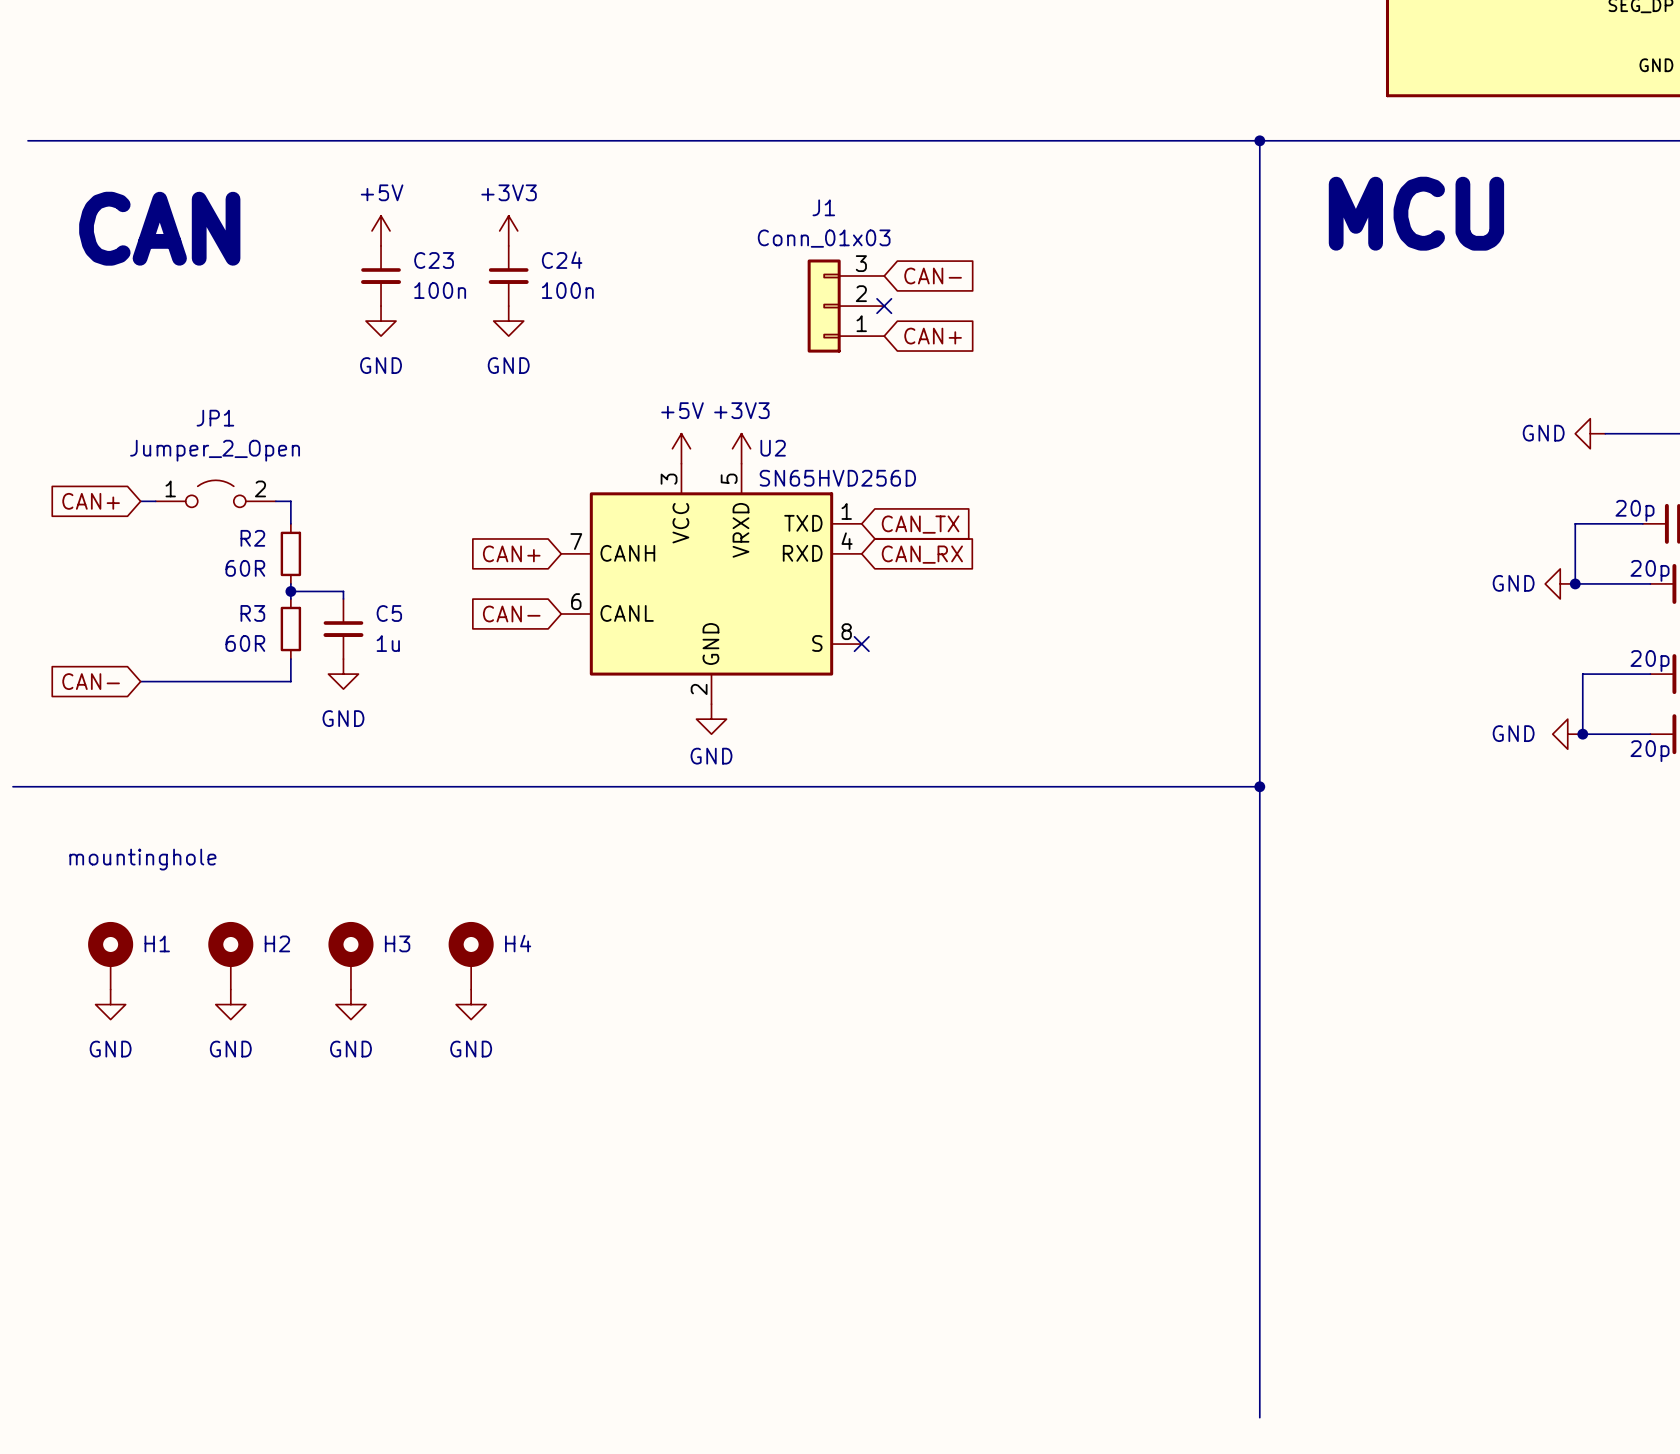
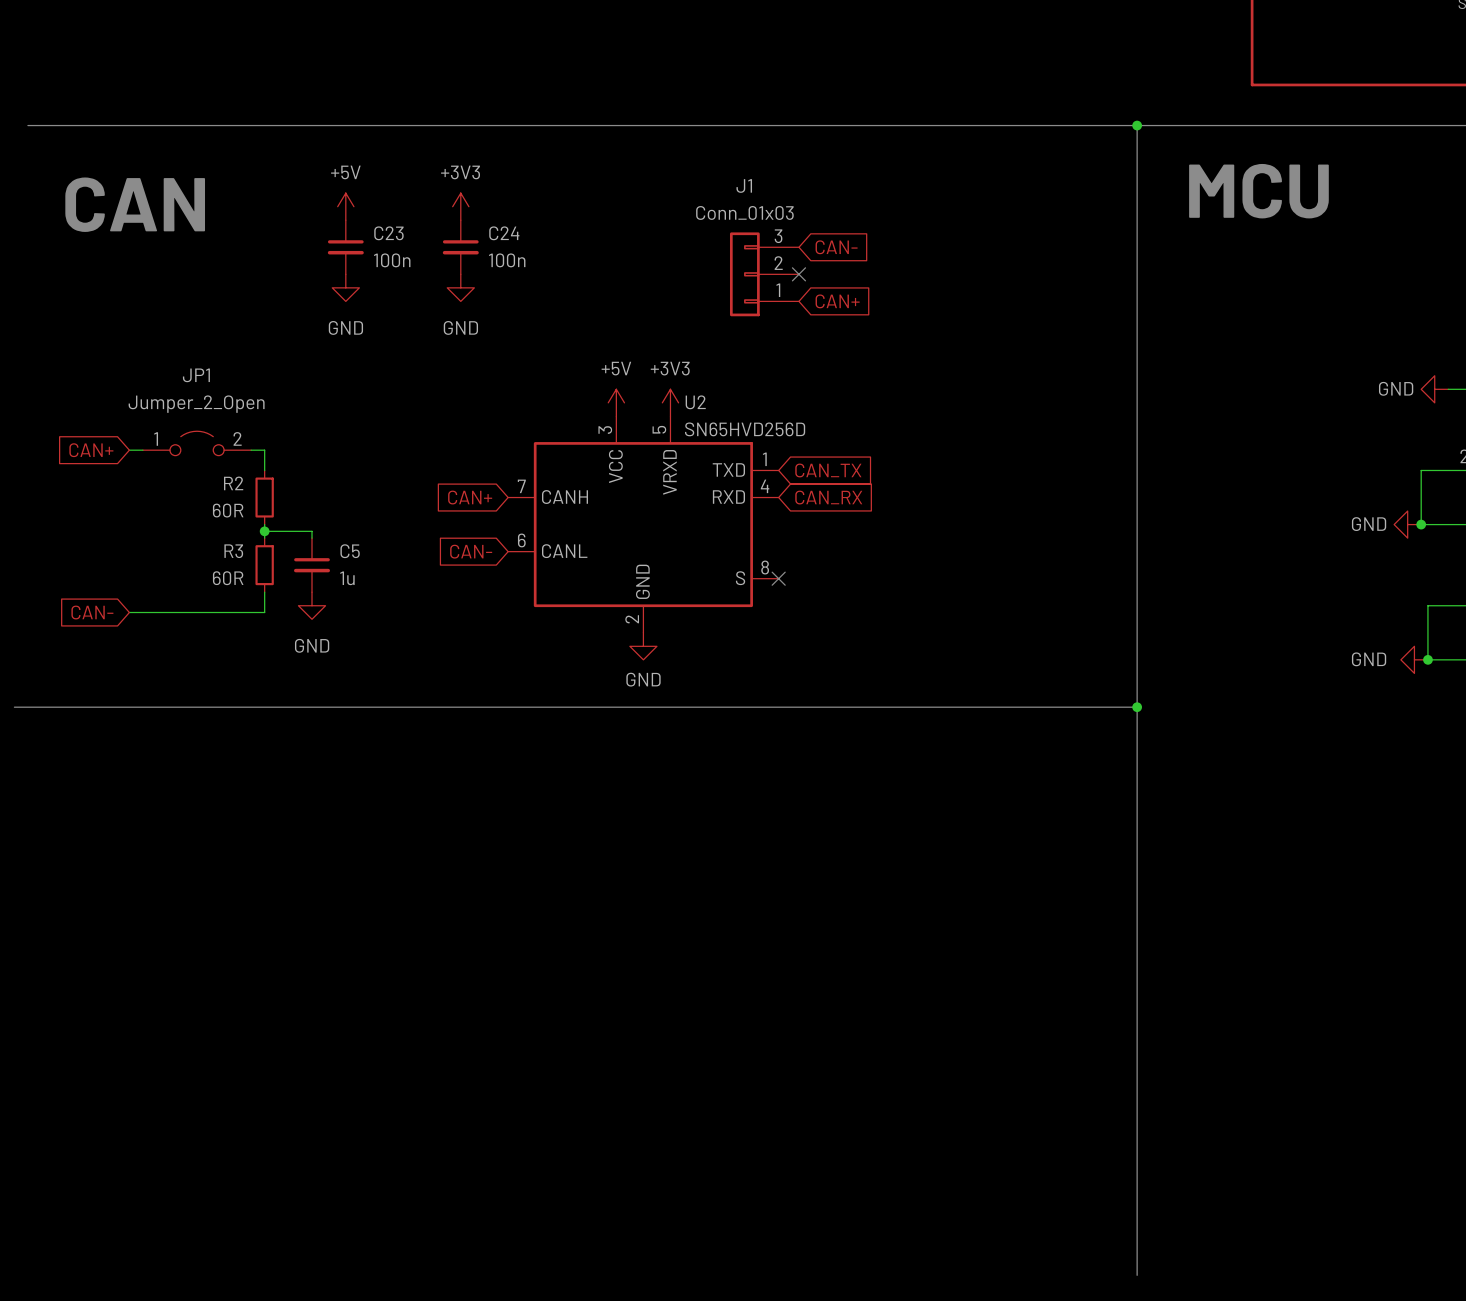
text: mountinghole (142, 859) -> none
H1: (110, 955) -> none
H2: (230, 955) -> none
H3: (350, 955) -> none
H4: (471, 955) -> none
power symbol: GND (110, 1004) -> none
power symbol: GND (230, 1004) -> none
power symbol: GND (350, 1004) -> none
power symbol: GND (471, 1004) -> none

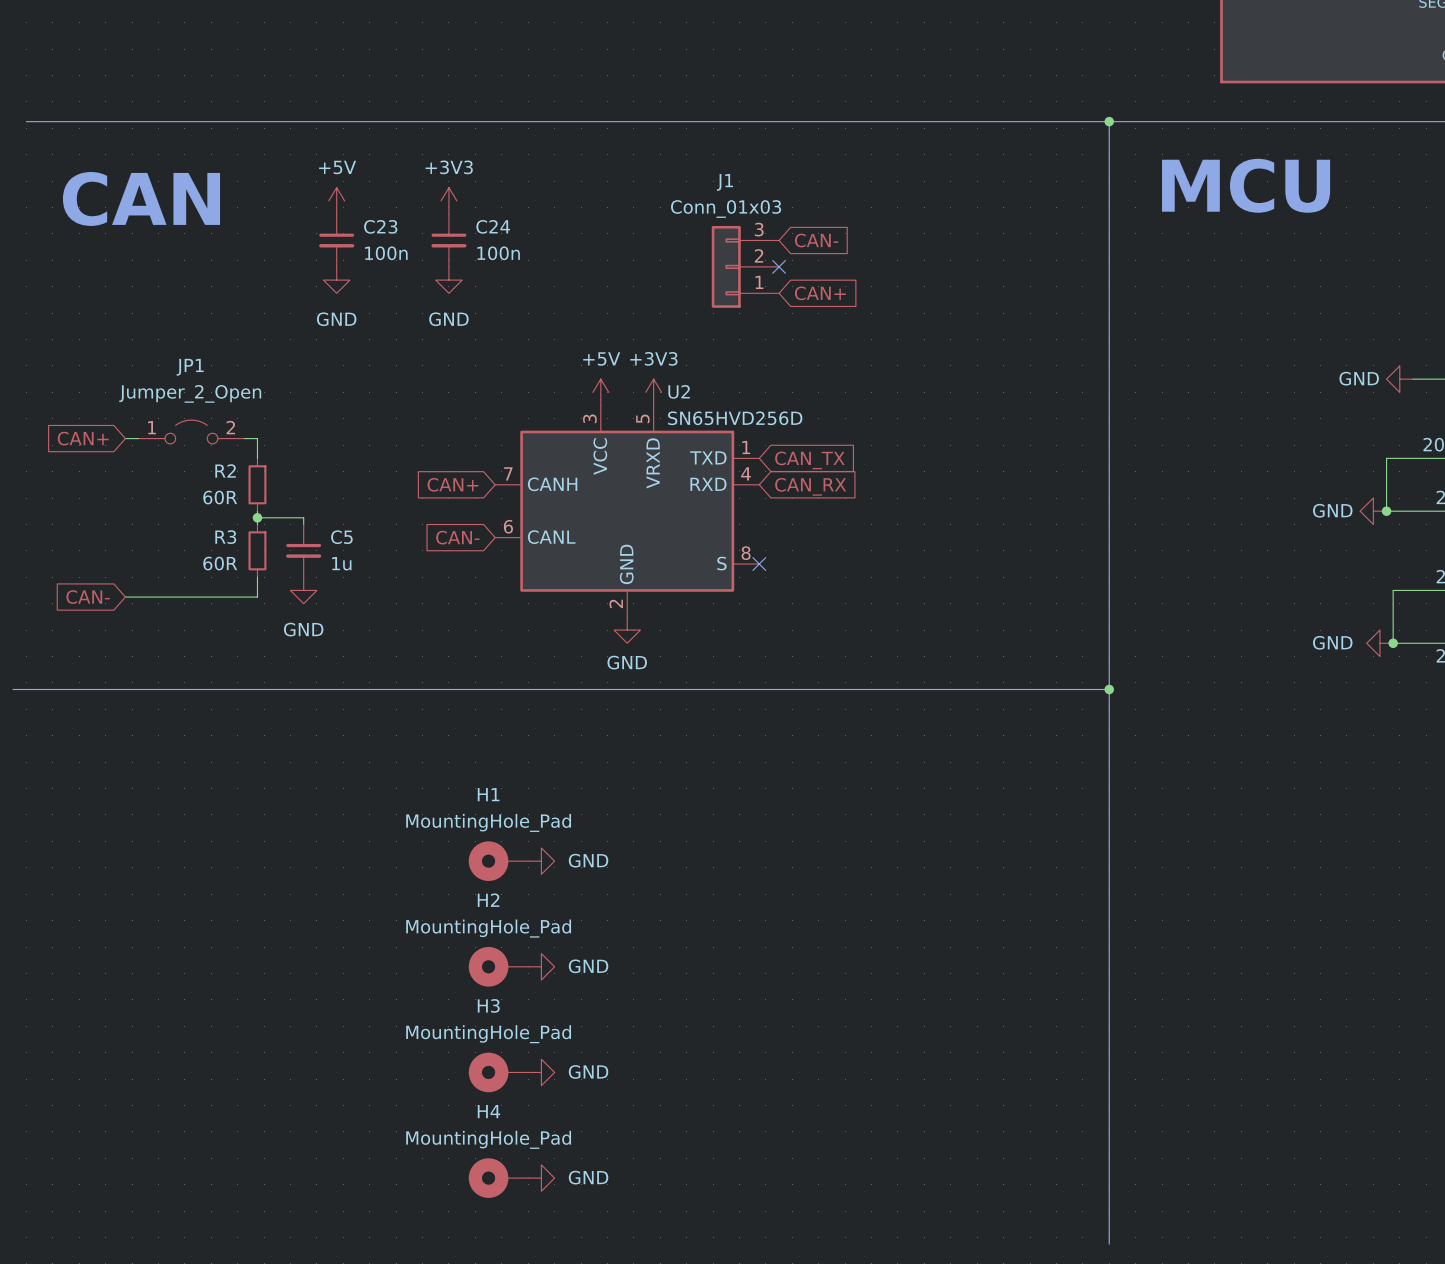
H1: none -> MountingHole_Pad (498, 861)
power symbol: none -> GND (541, 861)
H2: none -> MountingHole_Pad (498, 966)
power symbol: none -> GND (541, 966)
H3: none -> MountingHole_Pad (498, 1072)
power symbol: none -> GND (541, 1072)
H4: none -> MountingHole_Pad (498, 1178)
power symbol: none -> GND (541, 1178)

